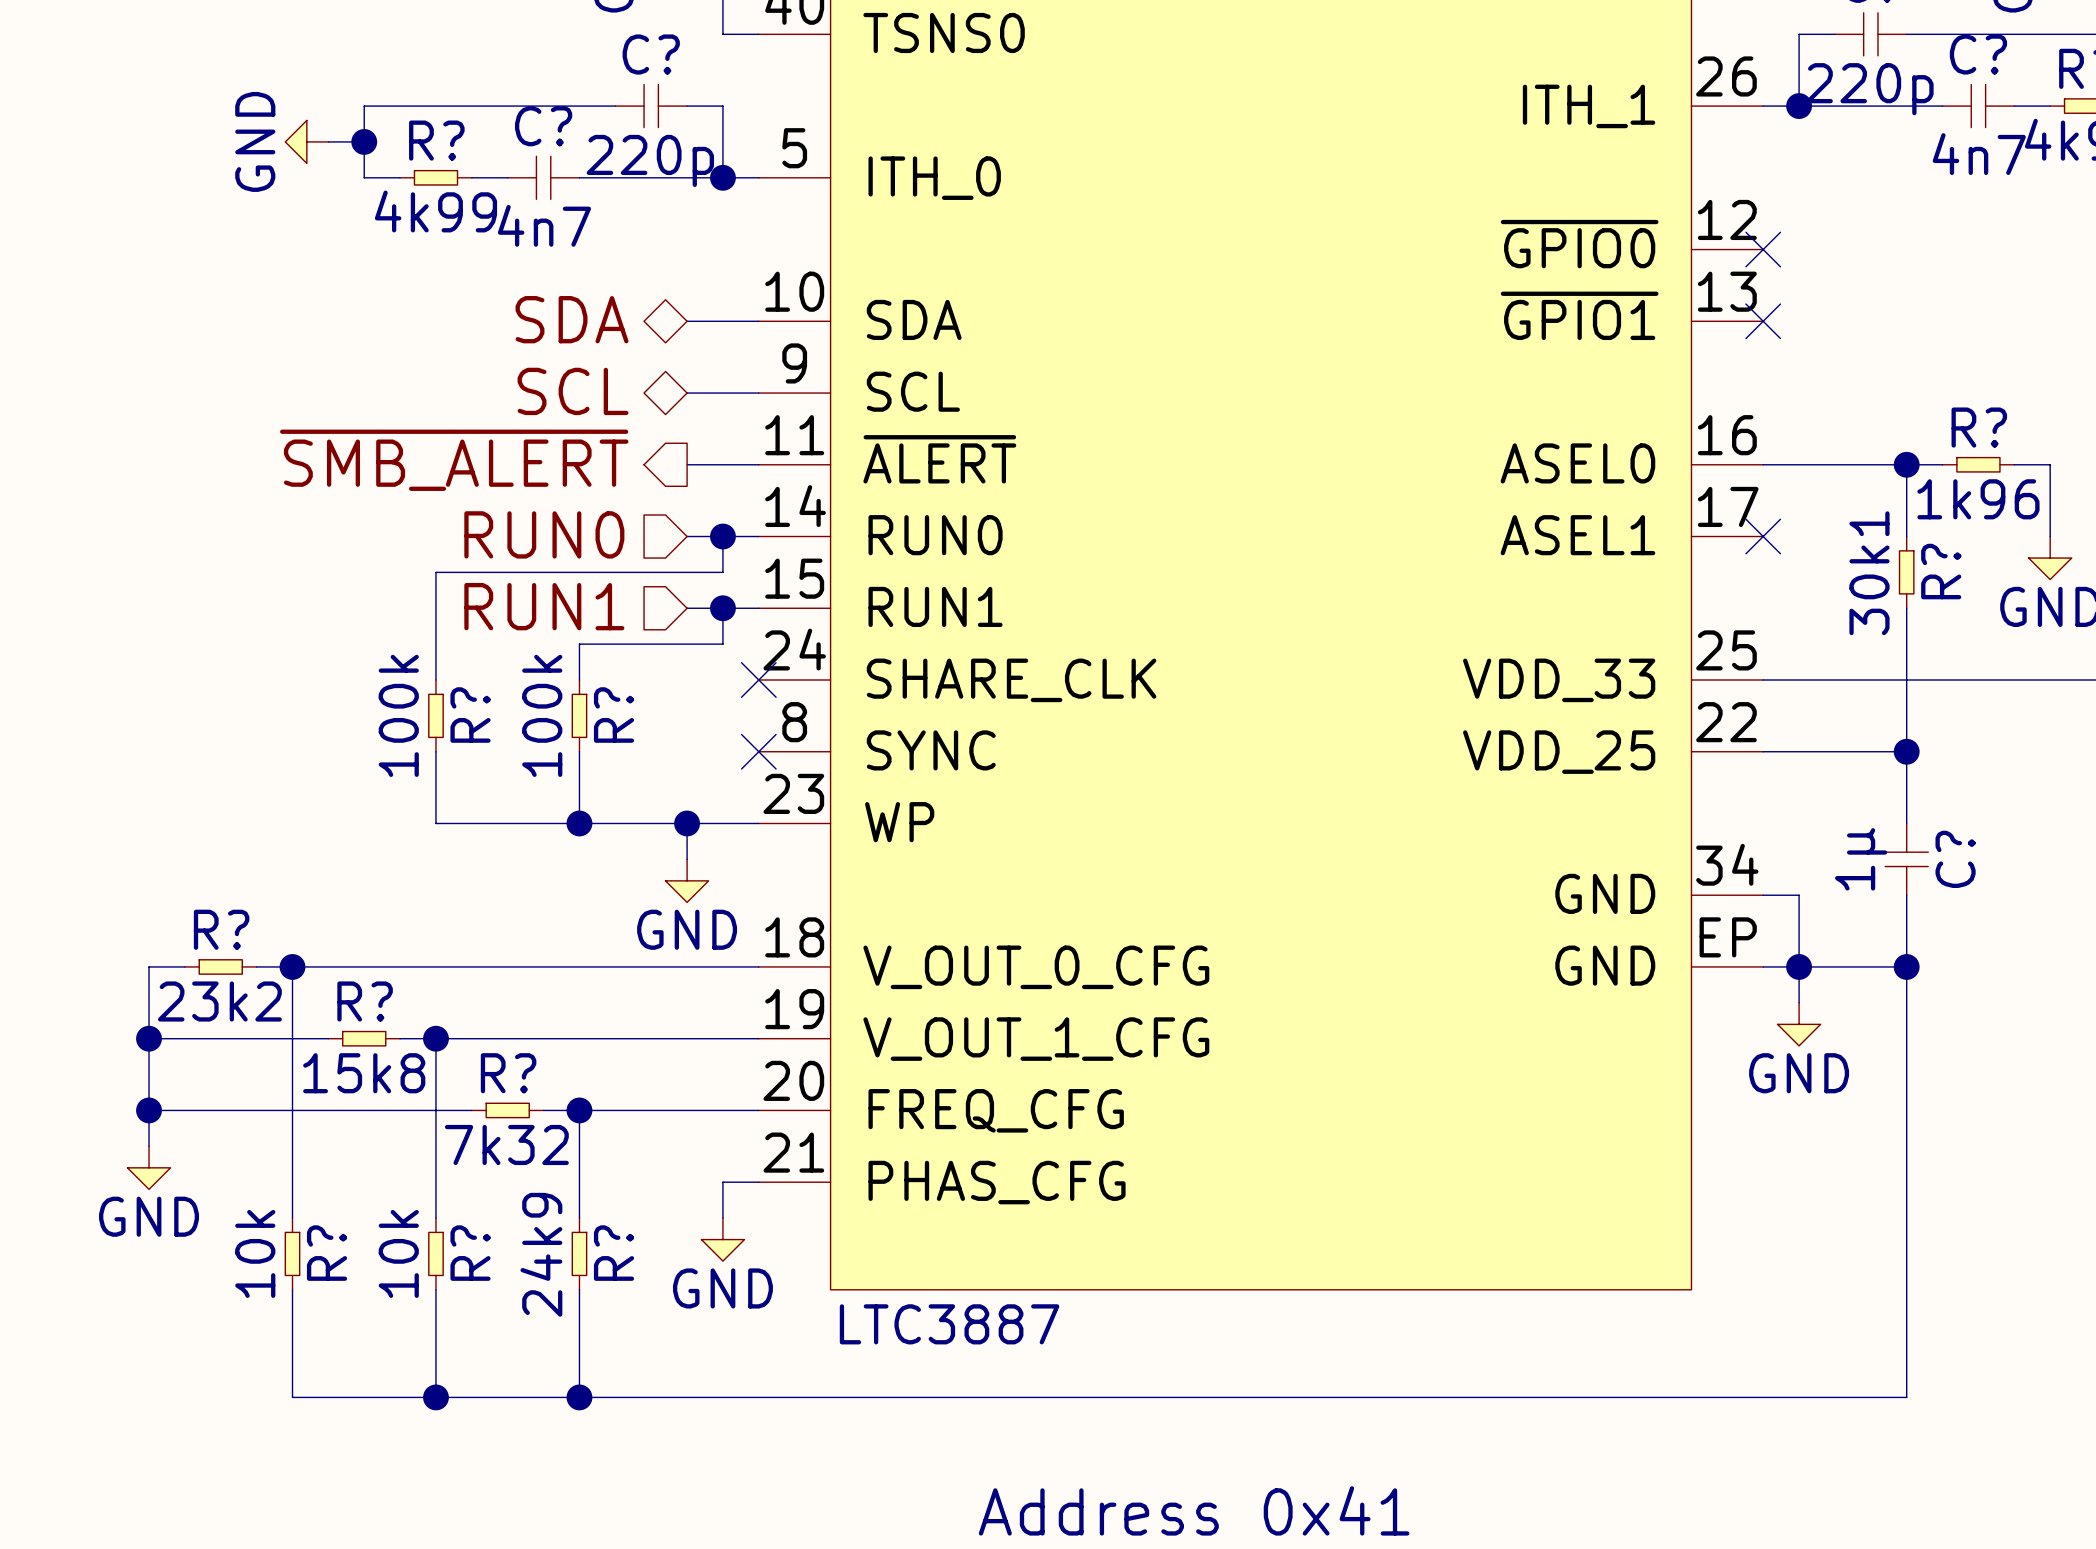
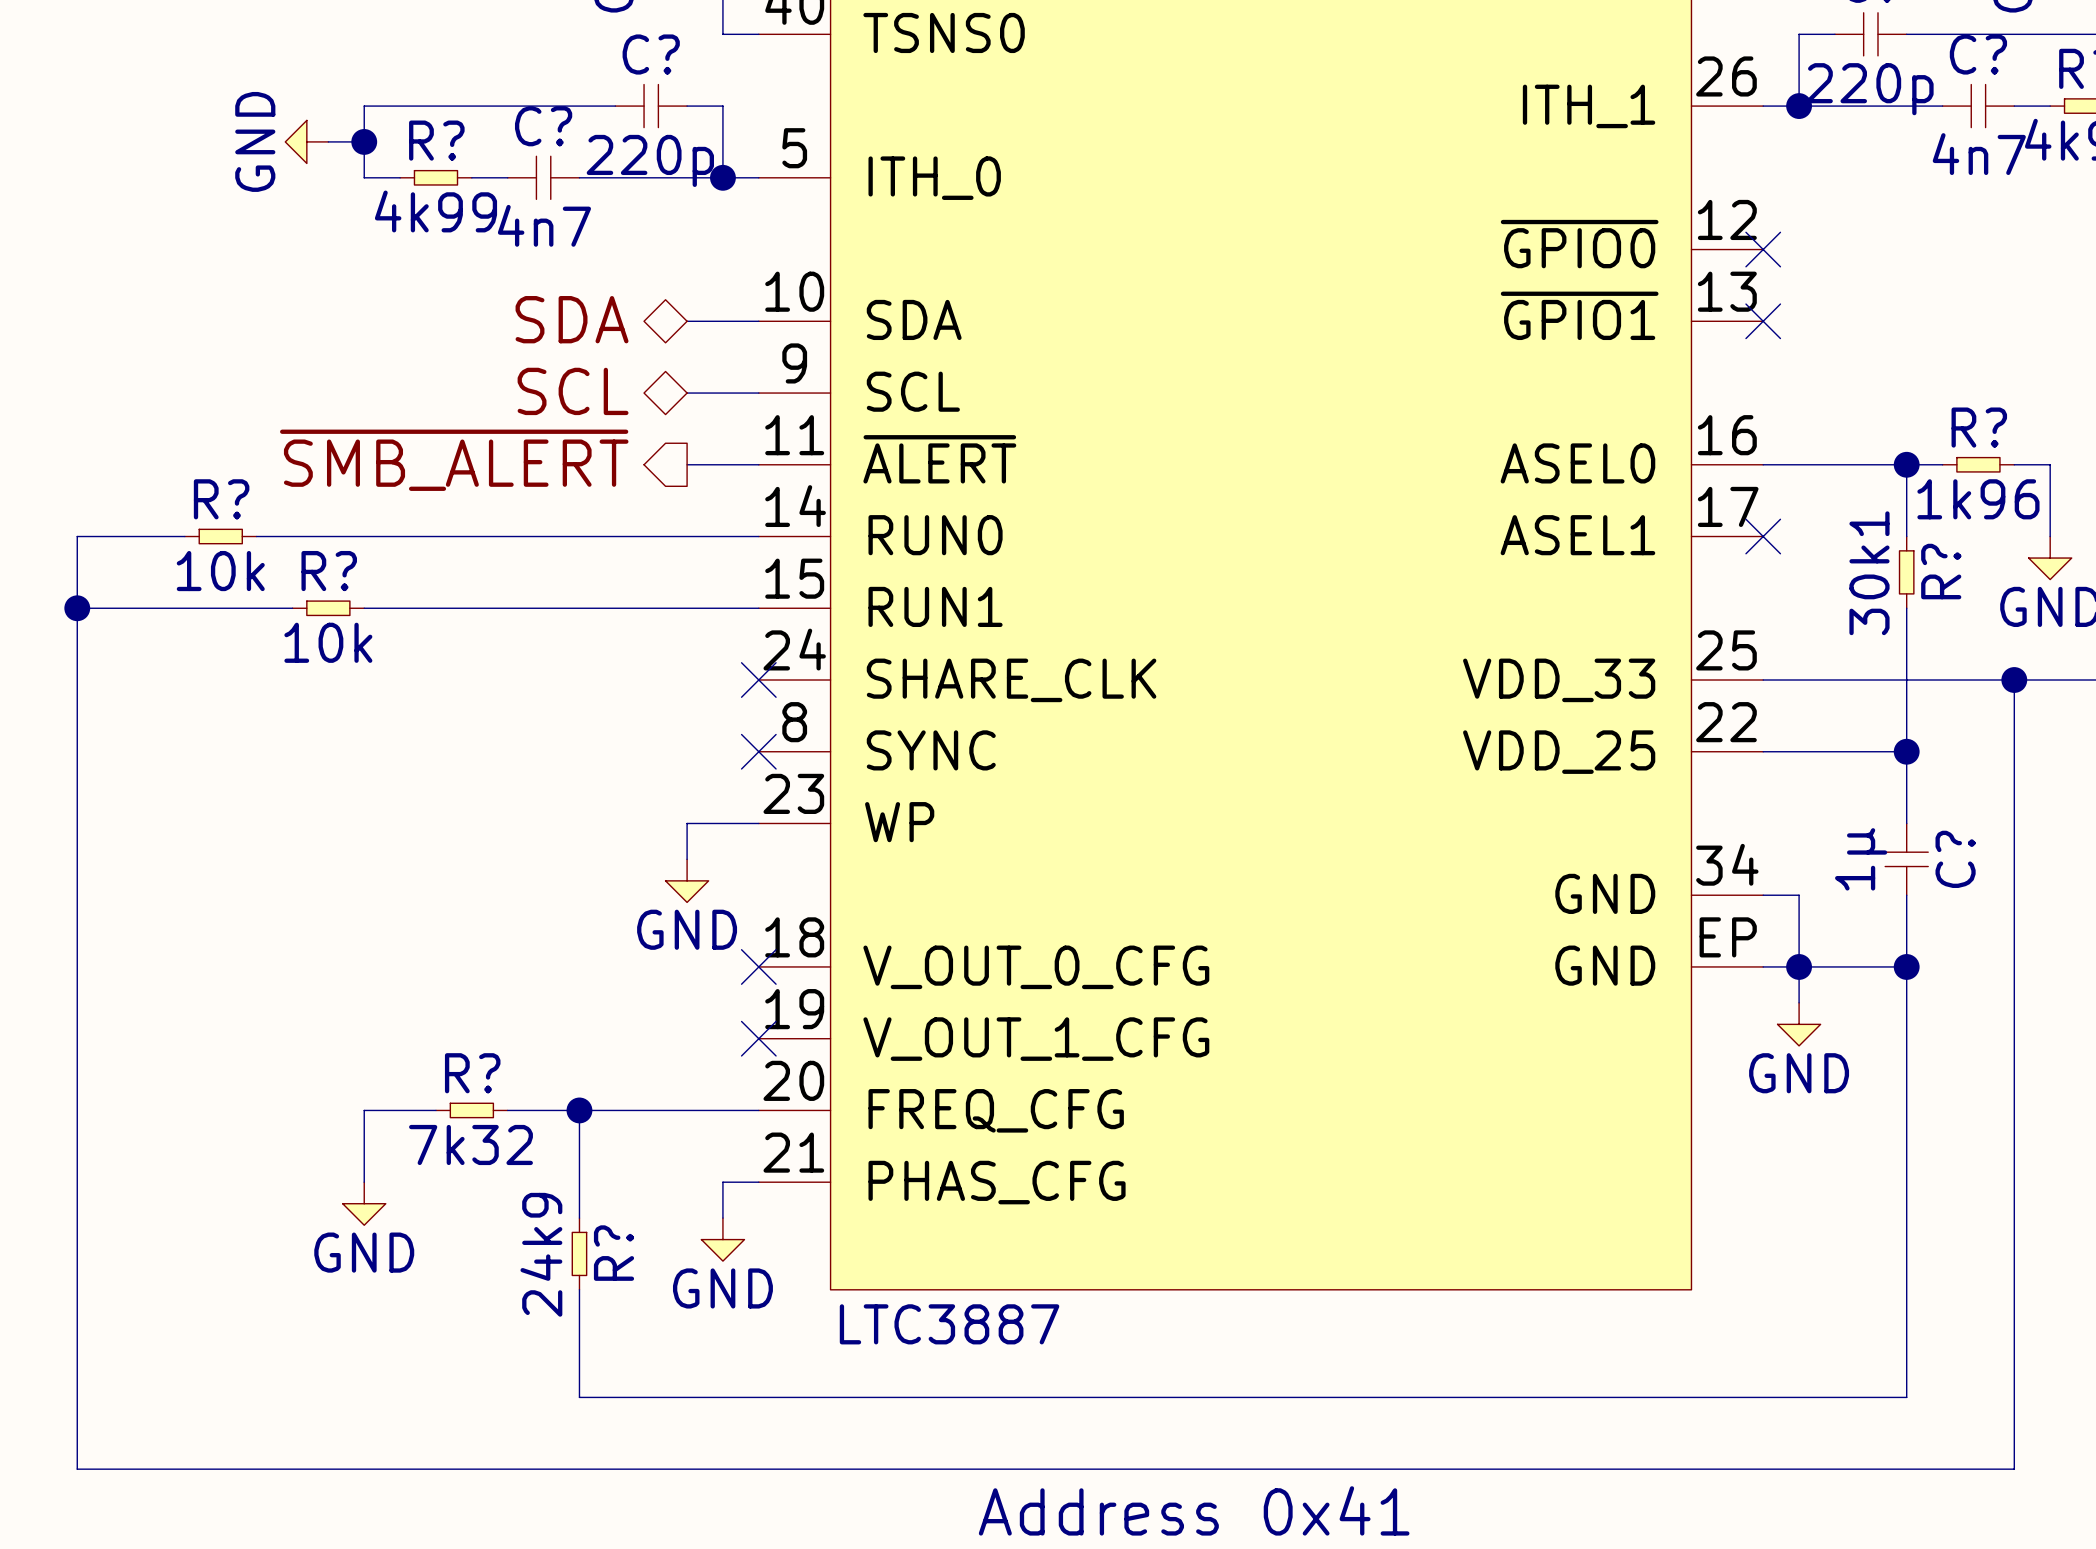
hierarchical label: RUN0 (544, 534) -> none
wire: none -> (184, 536) (77, 536) (77, 1469) (2014, 1469) (2014, 680)
R?: none -> 10k (220, 536)
wire: none -> (256, 536) (687, 536)
wire: (722, 536) (722, 572) (435, 572) (435, 680) -> none
junction: (722, 536) -> none
hierarchical label: RUN1 (544, 606) -> none
wire: none -> (77, 608) (292, 608)
junction: none -> (77, 608)
R?: none -> 10k (328, 608)
wire: none -> (364, 608) (687, 608)
wire: (722, 608) (722, 644) (579, 644) (579, 680) -> none
junction: (722, 608) -> none
junction: none -> (2014, 680)
R?: 100k (435, 715) -> none
R?: 100k (579, 715) -> none
wire: (435, 751) (435, 823) (687, 823) -> none
wire: (579, 751) (579, 823) -> none
junction: (579, 823) -> none
junction: (687, 823) -> none
wire: (184, 966) (149, 966) (149, 1146) -> none
R?: 23k2 (220, 966) -> none
wire: (256, 966) (758, 966) -> none
wire: (292, 966) (292, 1218) -> none
junction: (292, 966) -> none
no-connect mark: none -> (758, 966)
wire: (149, 1038) (328, 1038) -> none
junction: (149, 1038) -> none
R?: 15k8 (364, 1038) -> none
wire: (400, 1038) (758, 1038) -> none
wire: (435, 1038) (435, 1218) -> none
junction: (435, 1038) -> none
no-connect mark: none -> (758, 1038)
wire: (149, 1110) (364, 1110) -> (364, 1182) (364, 1110)
junction: (149, 1110) -> none
R? position: (507, 1110) -> (471, 1110)
power symbol position: GND (149, 1167) -> GND (364, 1203)
R?: 10k (292, 1253) -> none
R?: 10k (435, 1253) -> none
wire: (292, 1289) (292, 1397) (579, 1397) -> none
wire: (435, 1289) (435, 1397) -> none
junction: (435, 1397) -> none
junction: (579, 1397) -> none

